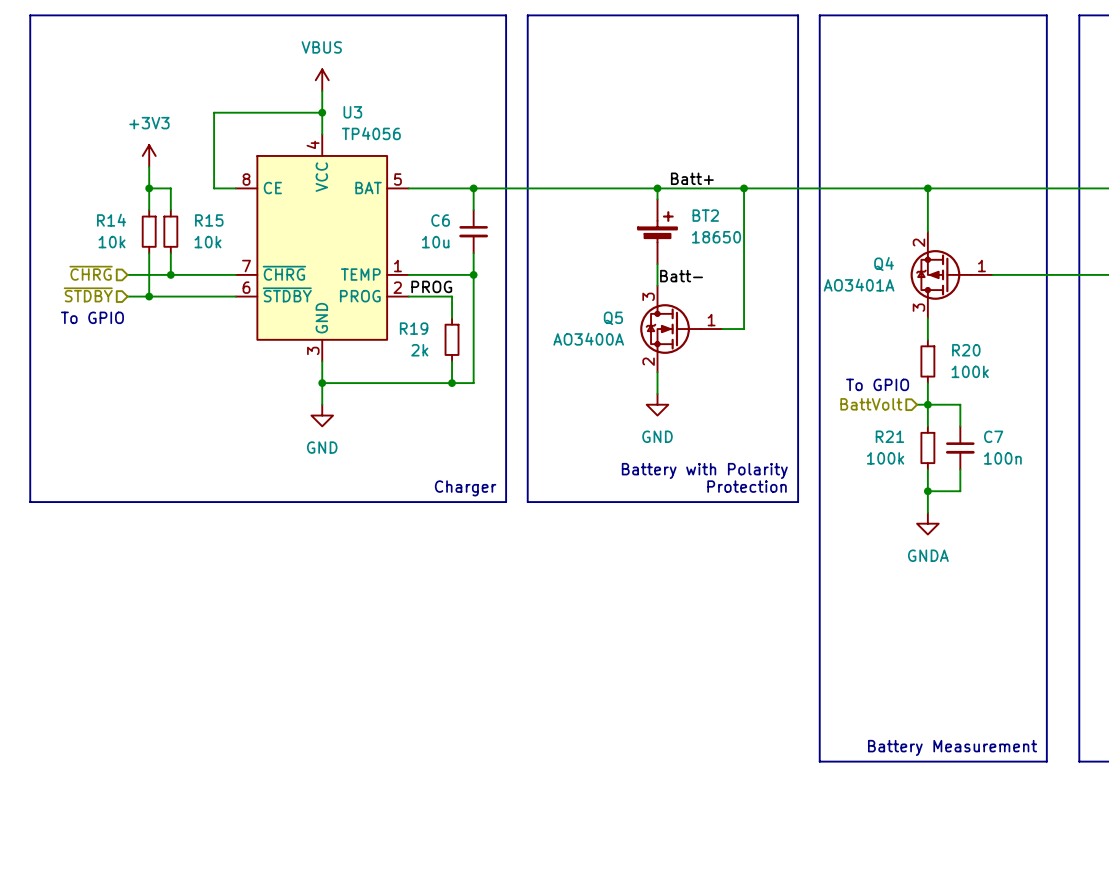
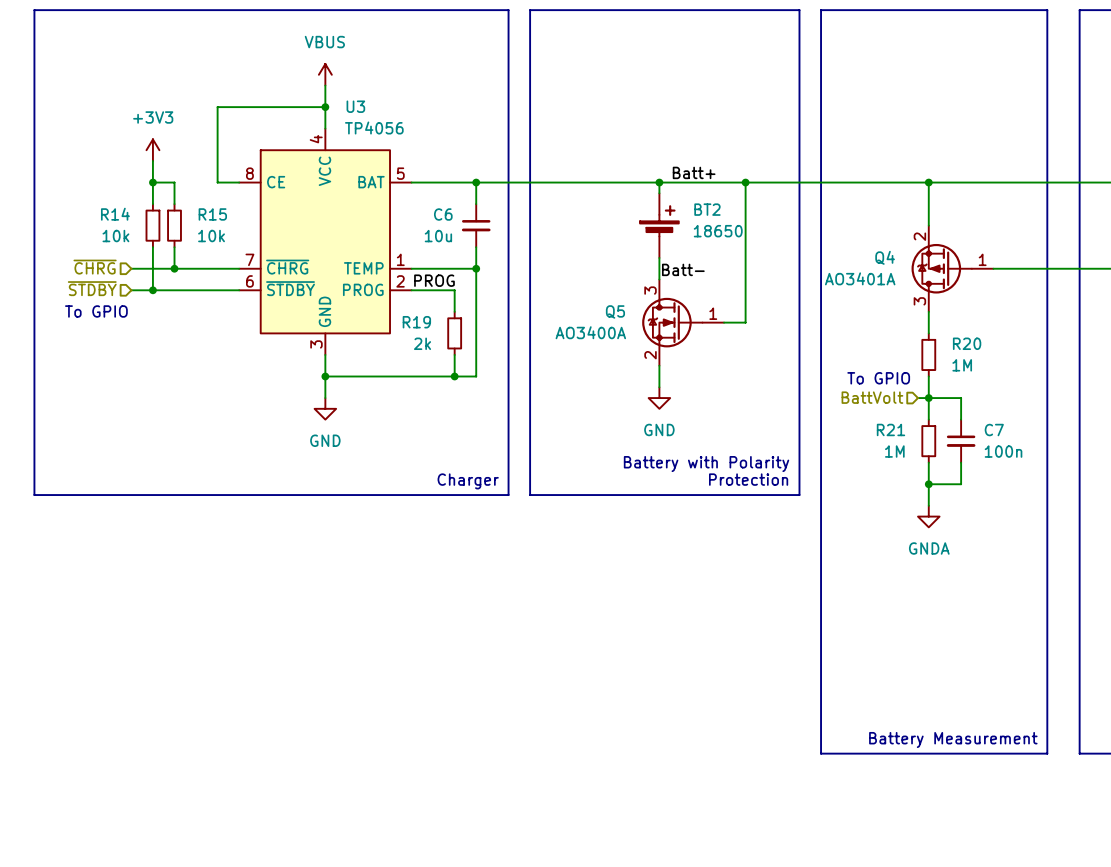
R20 value: 100k (970, 371) -> 1M (962, 365)
R21 value: 100k (885, 458) -> 1M (894, 451)

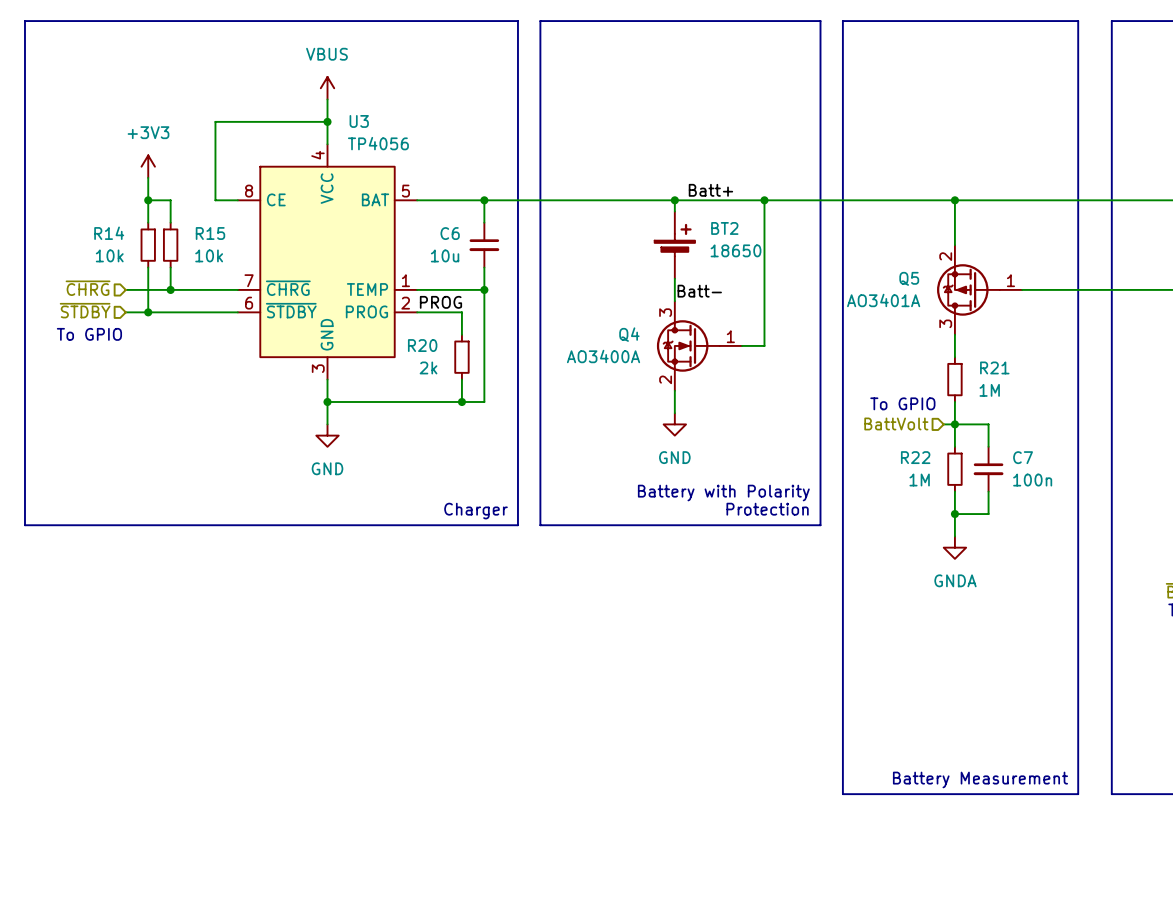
Q4 name: Q4 (885, 257) -> Q5 (909, 278)
Q5 name: Q5 (615, 311) -> Q4 (629, 334)
R19 name: R19 (416, 322) -> R20 (422, 345)
R20 name: R20 (967, 343) -> R21 (994, 367)
R21 name: R21 (890, 429) -> R22 (915, 457)

